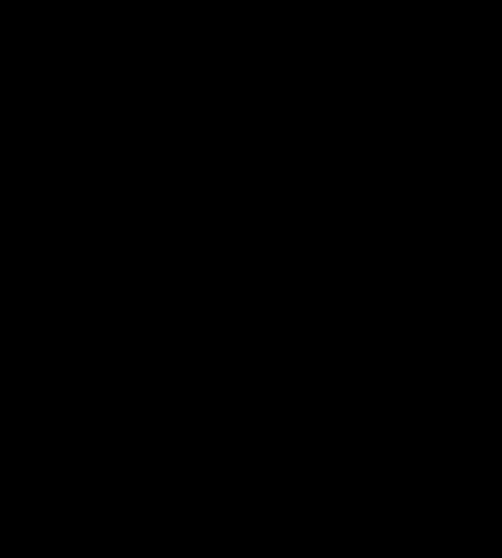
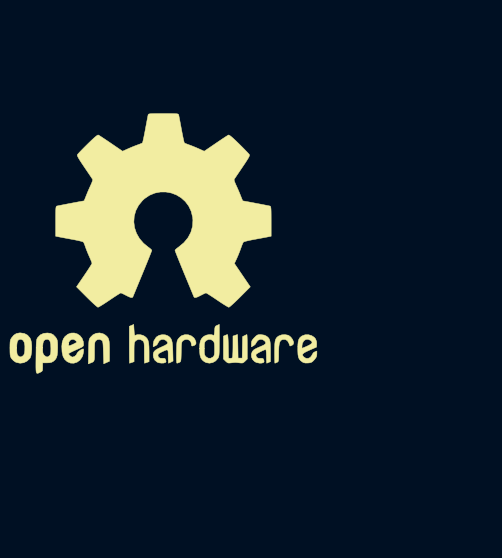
drawing: none -> [9, 113, 318, 374]

